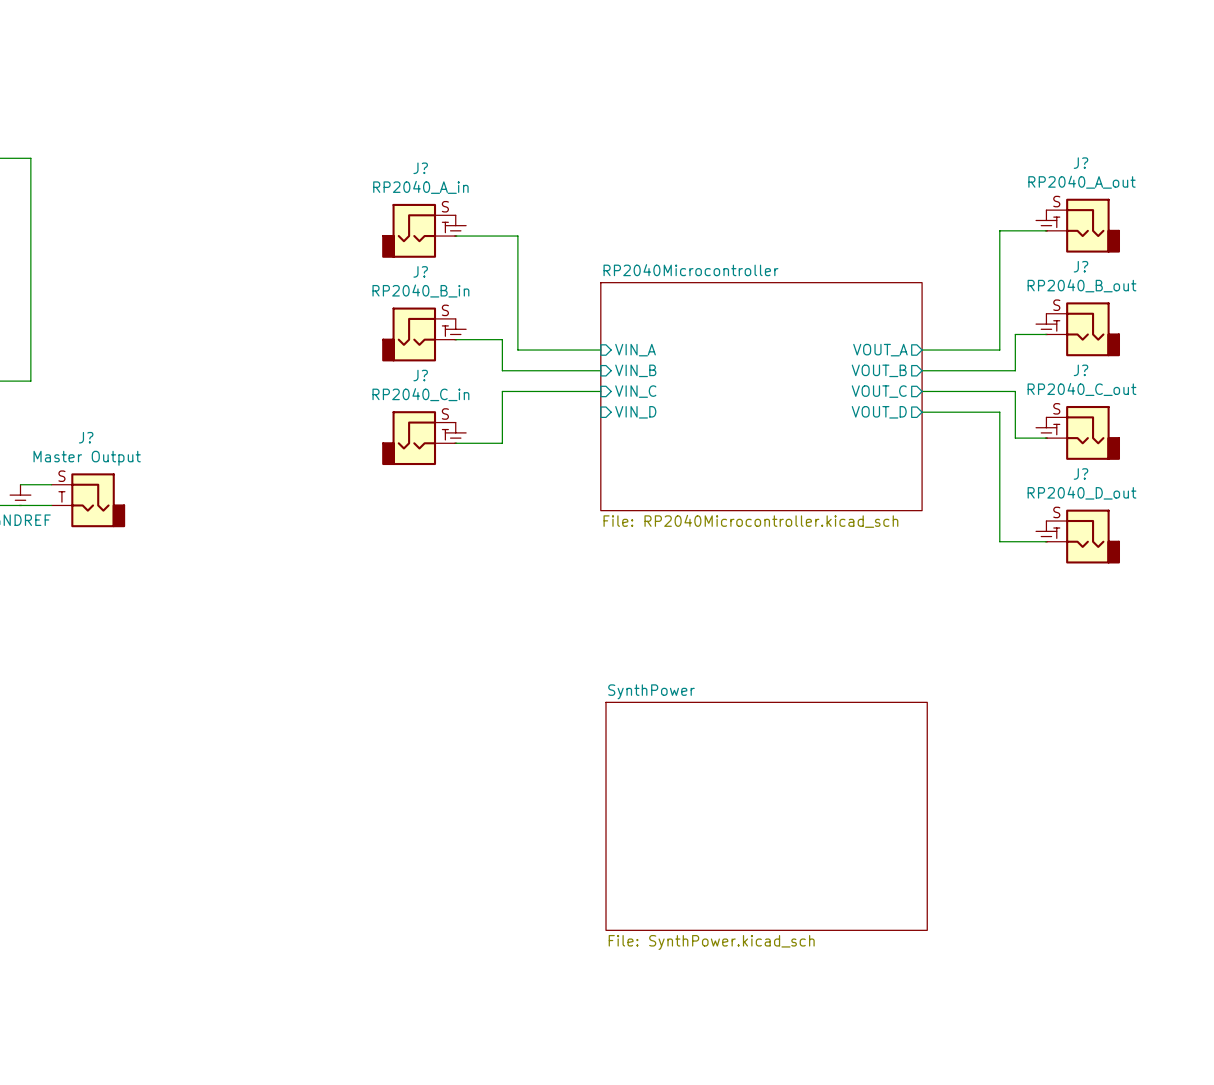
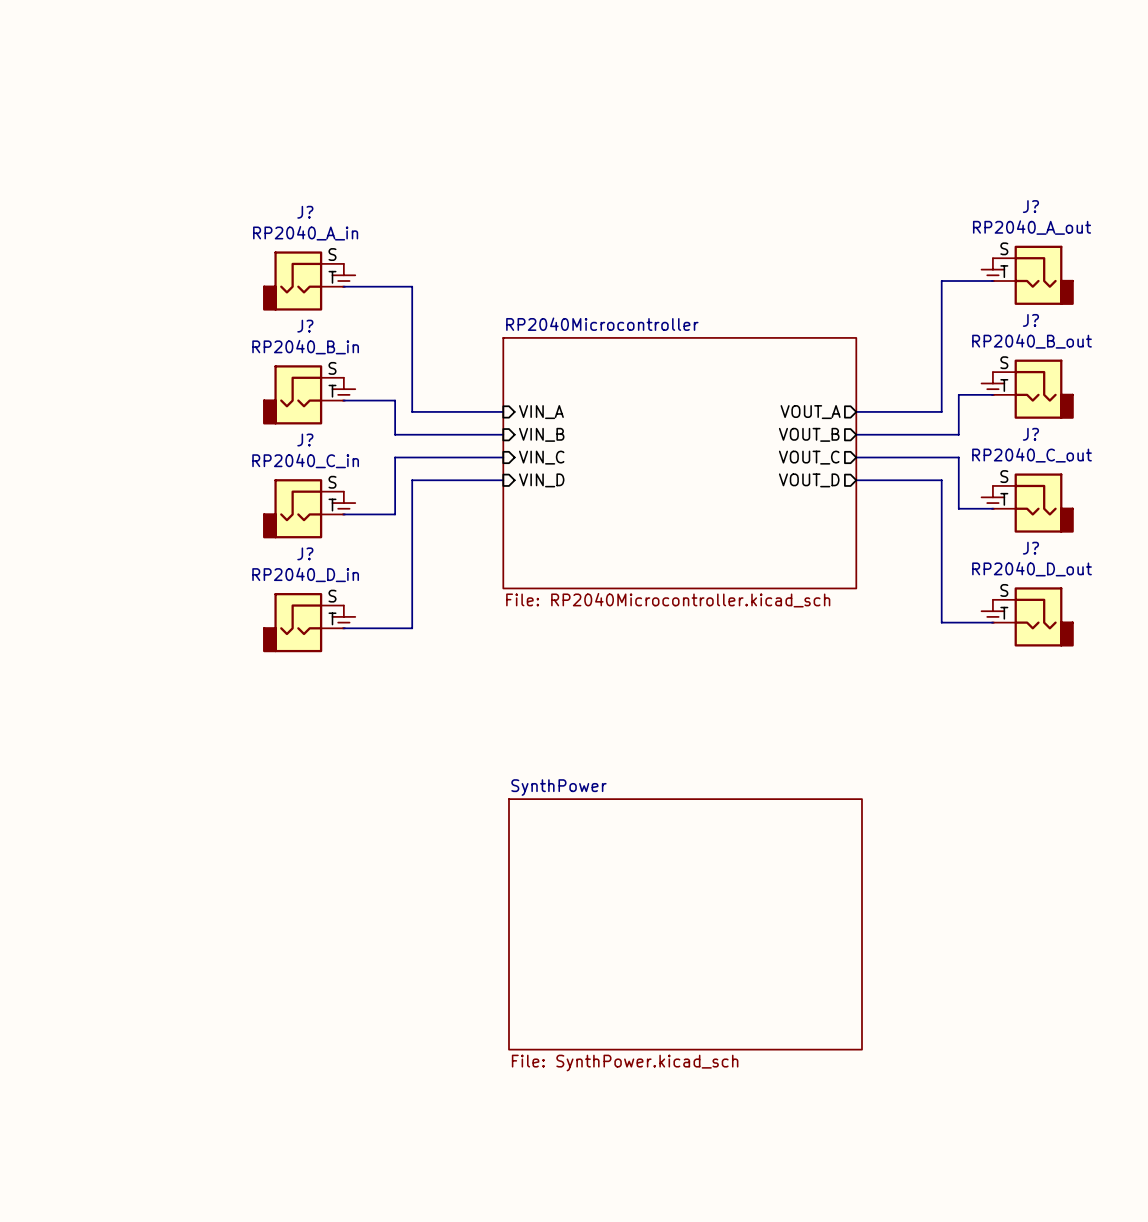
wire: none -> (503, 480) (412, 480) (412, 628) (343, 628)
power symbol: none -> (343, 616)
J?: none -> RP2040_D_in (303, 622)

